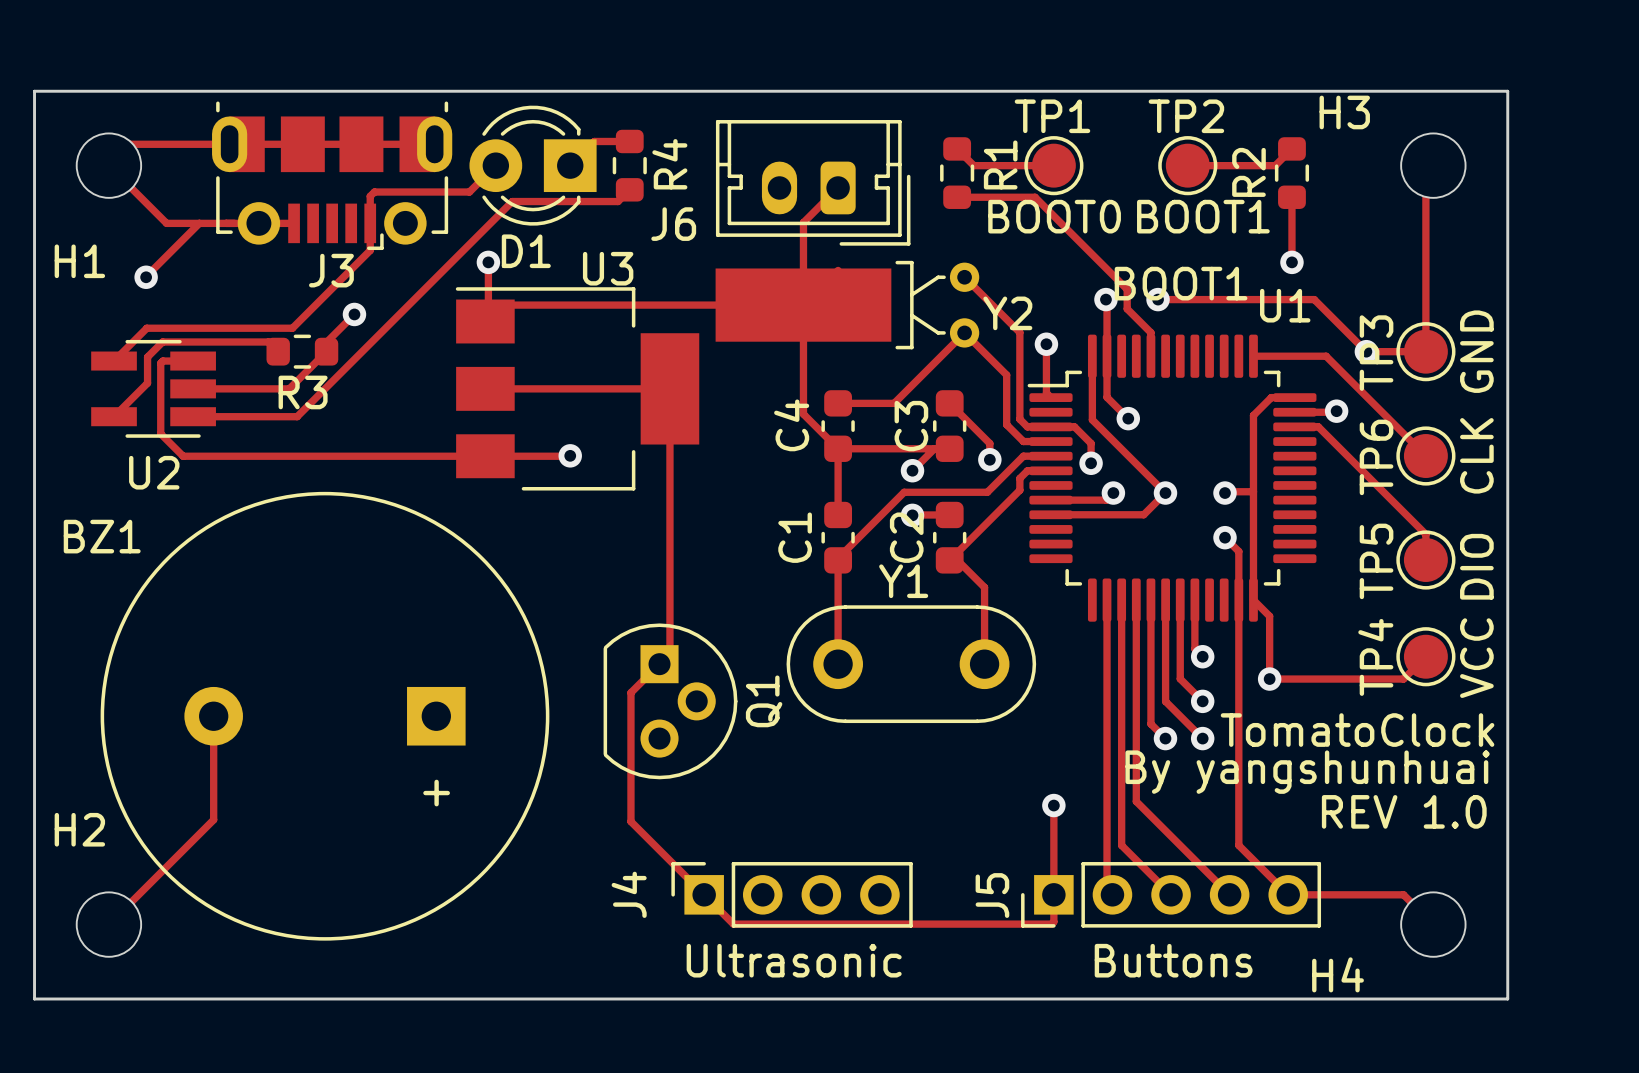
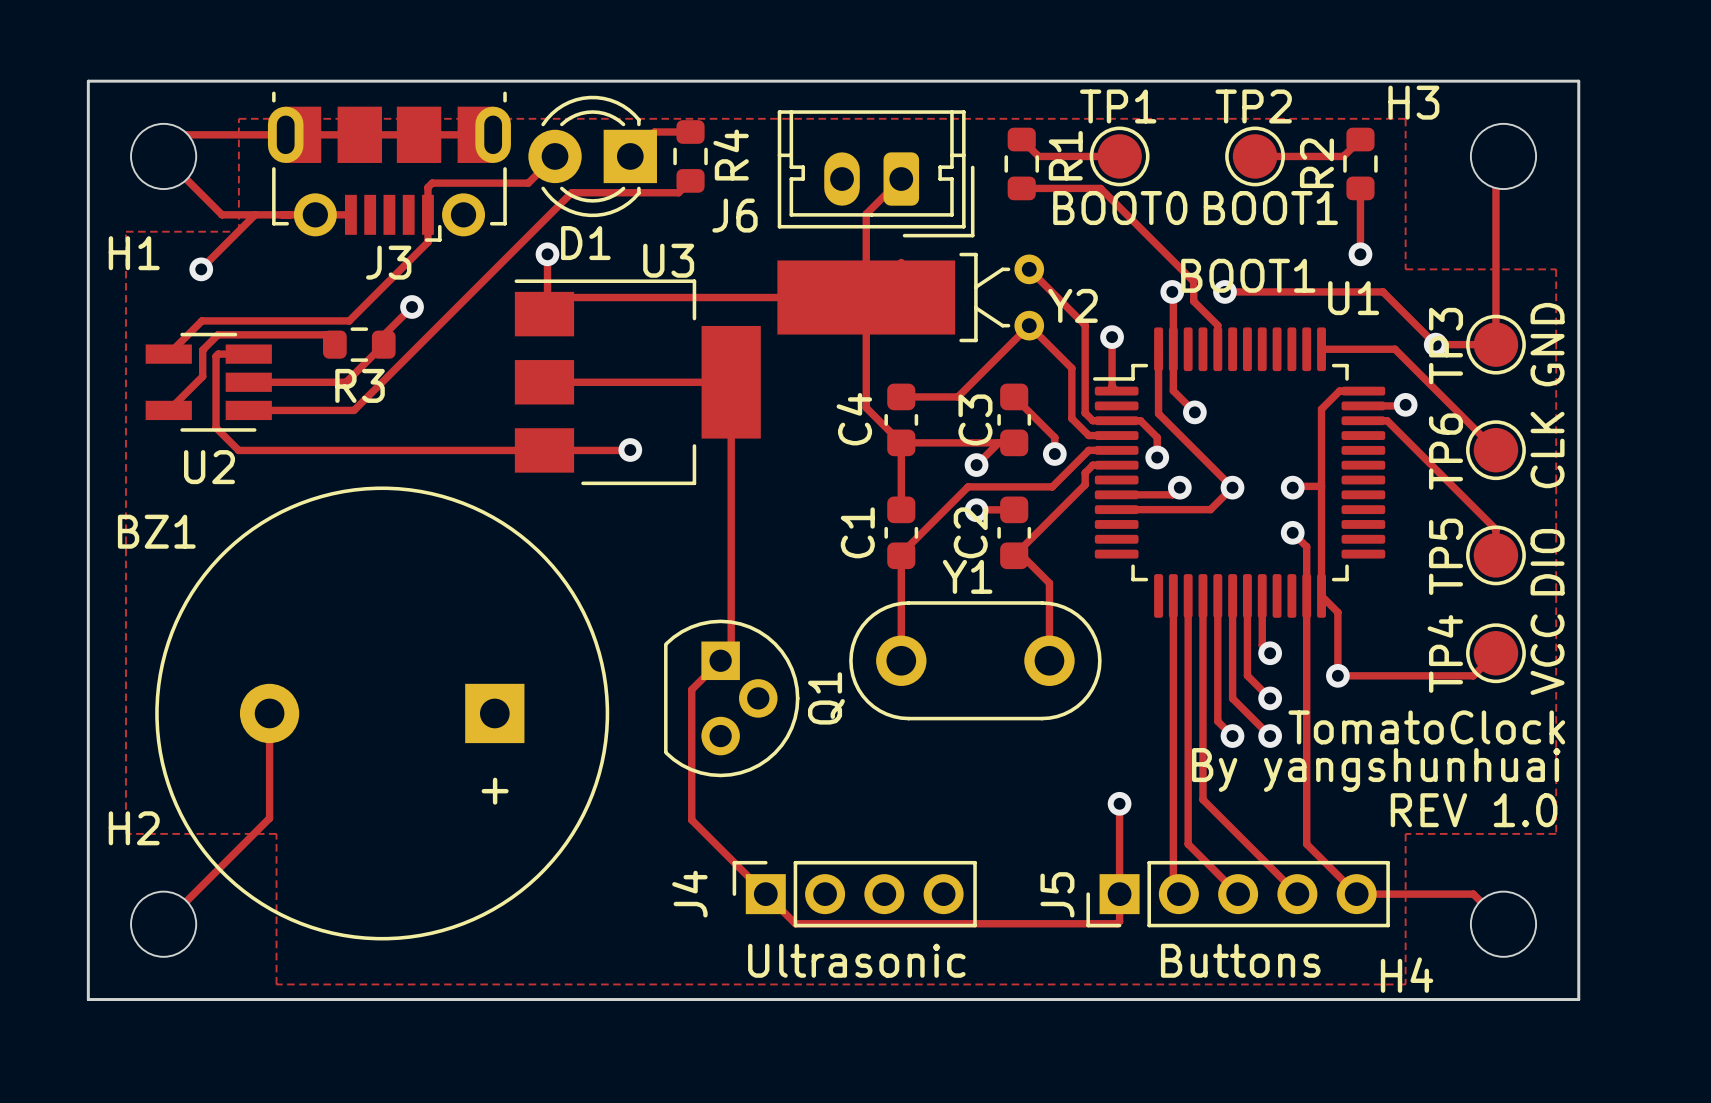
zone outline: none -> (238, 118) (238, 231) (125, 231) (125, 833) (276, 833) (276, 984) (1405, 984) (1405, 833) (1556, 833) (1556, 269) (1405, 269) (1405, 118) (238, 118)

